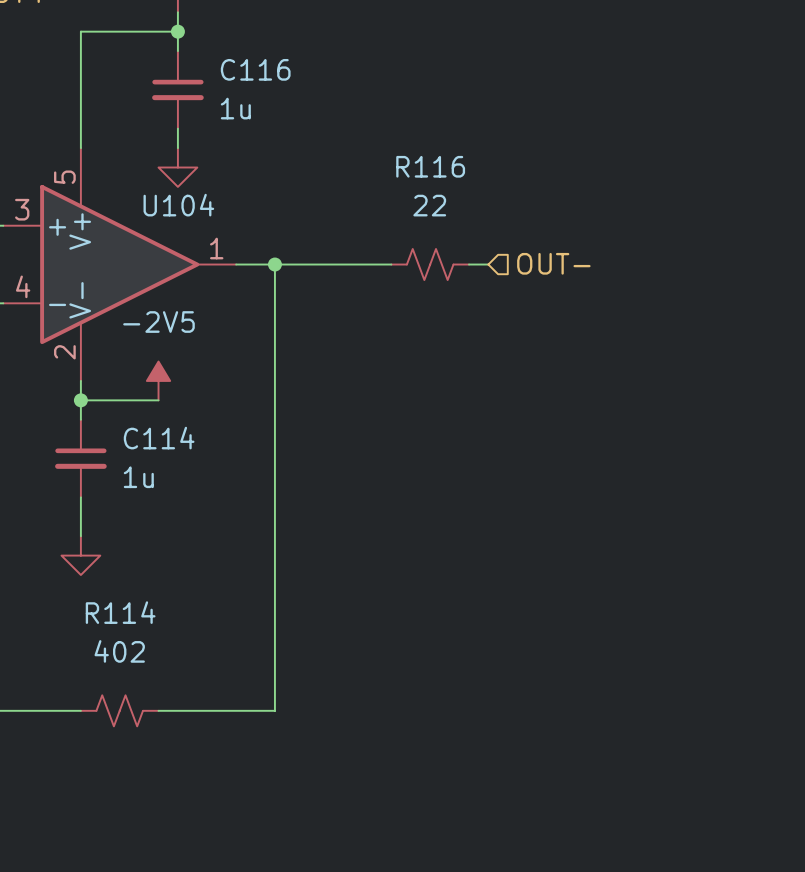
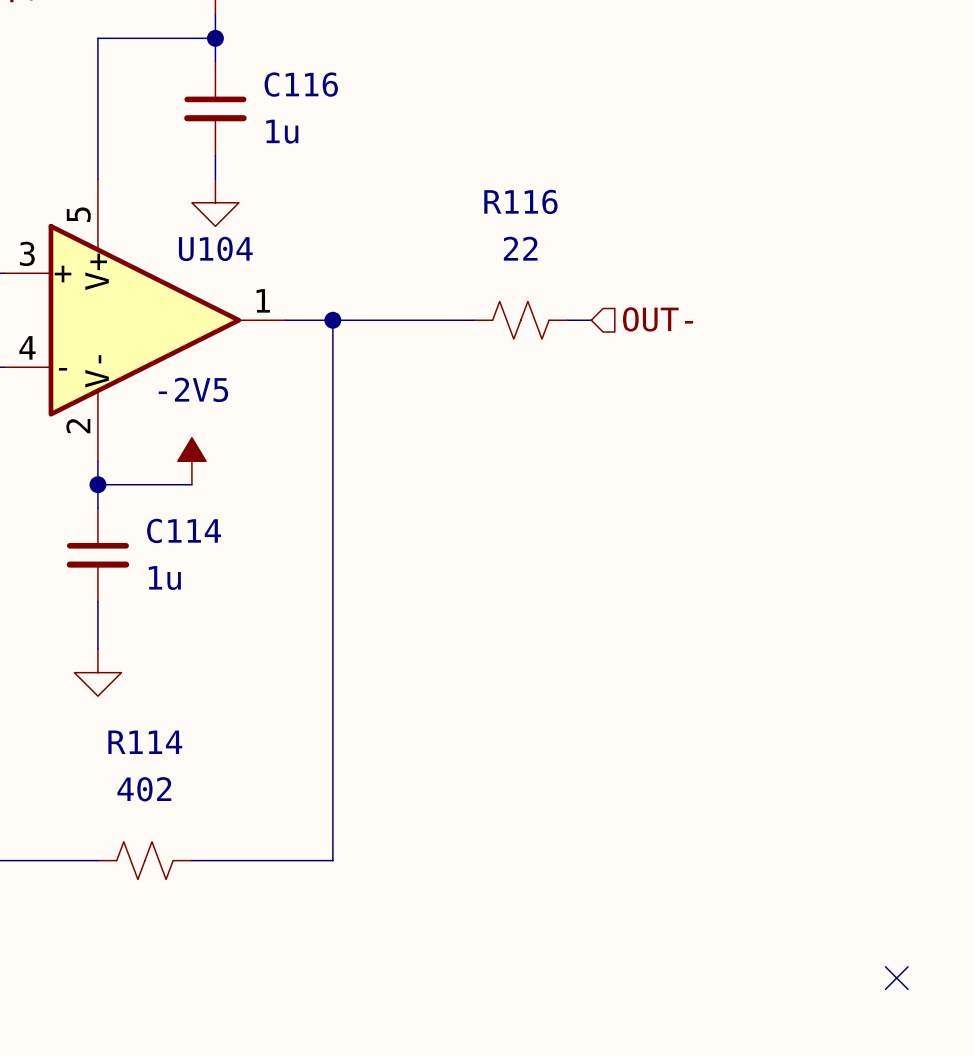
no-connect mark: none -> (896, 978)

